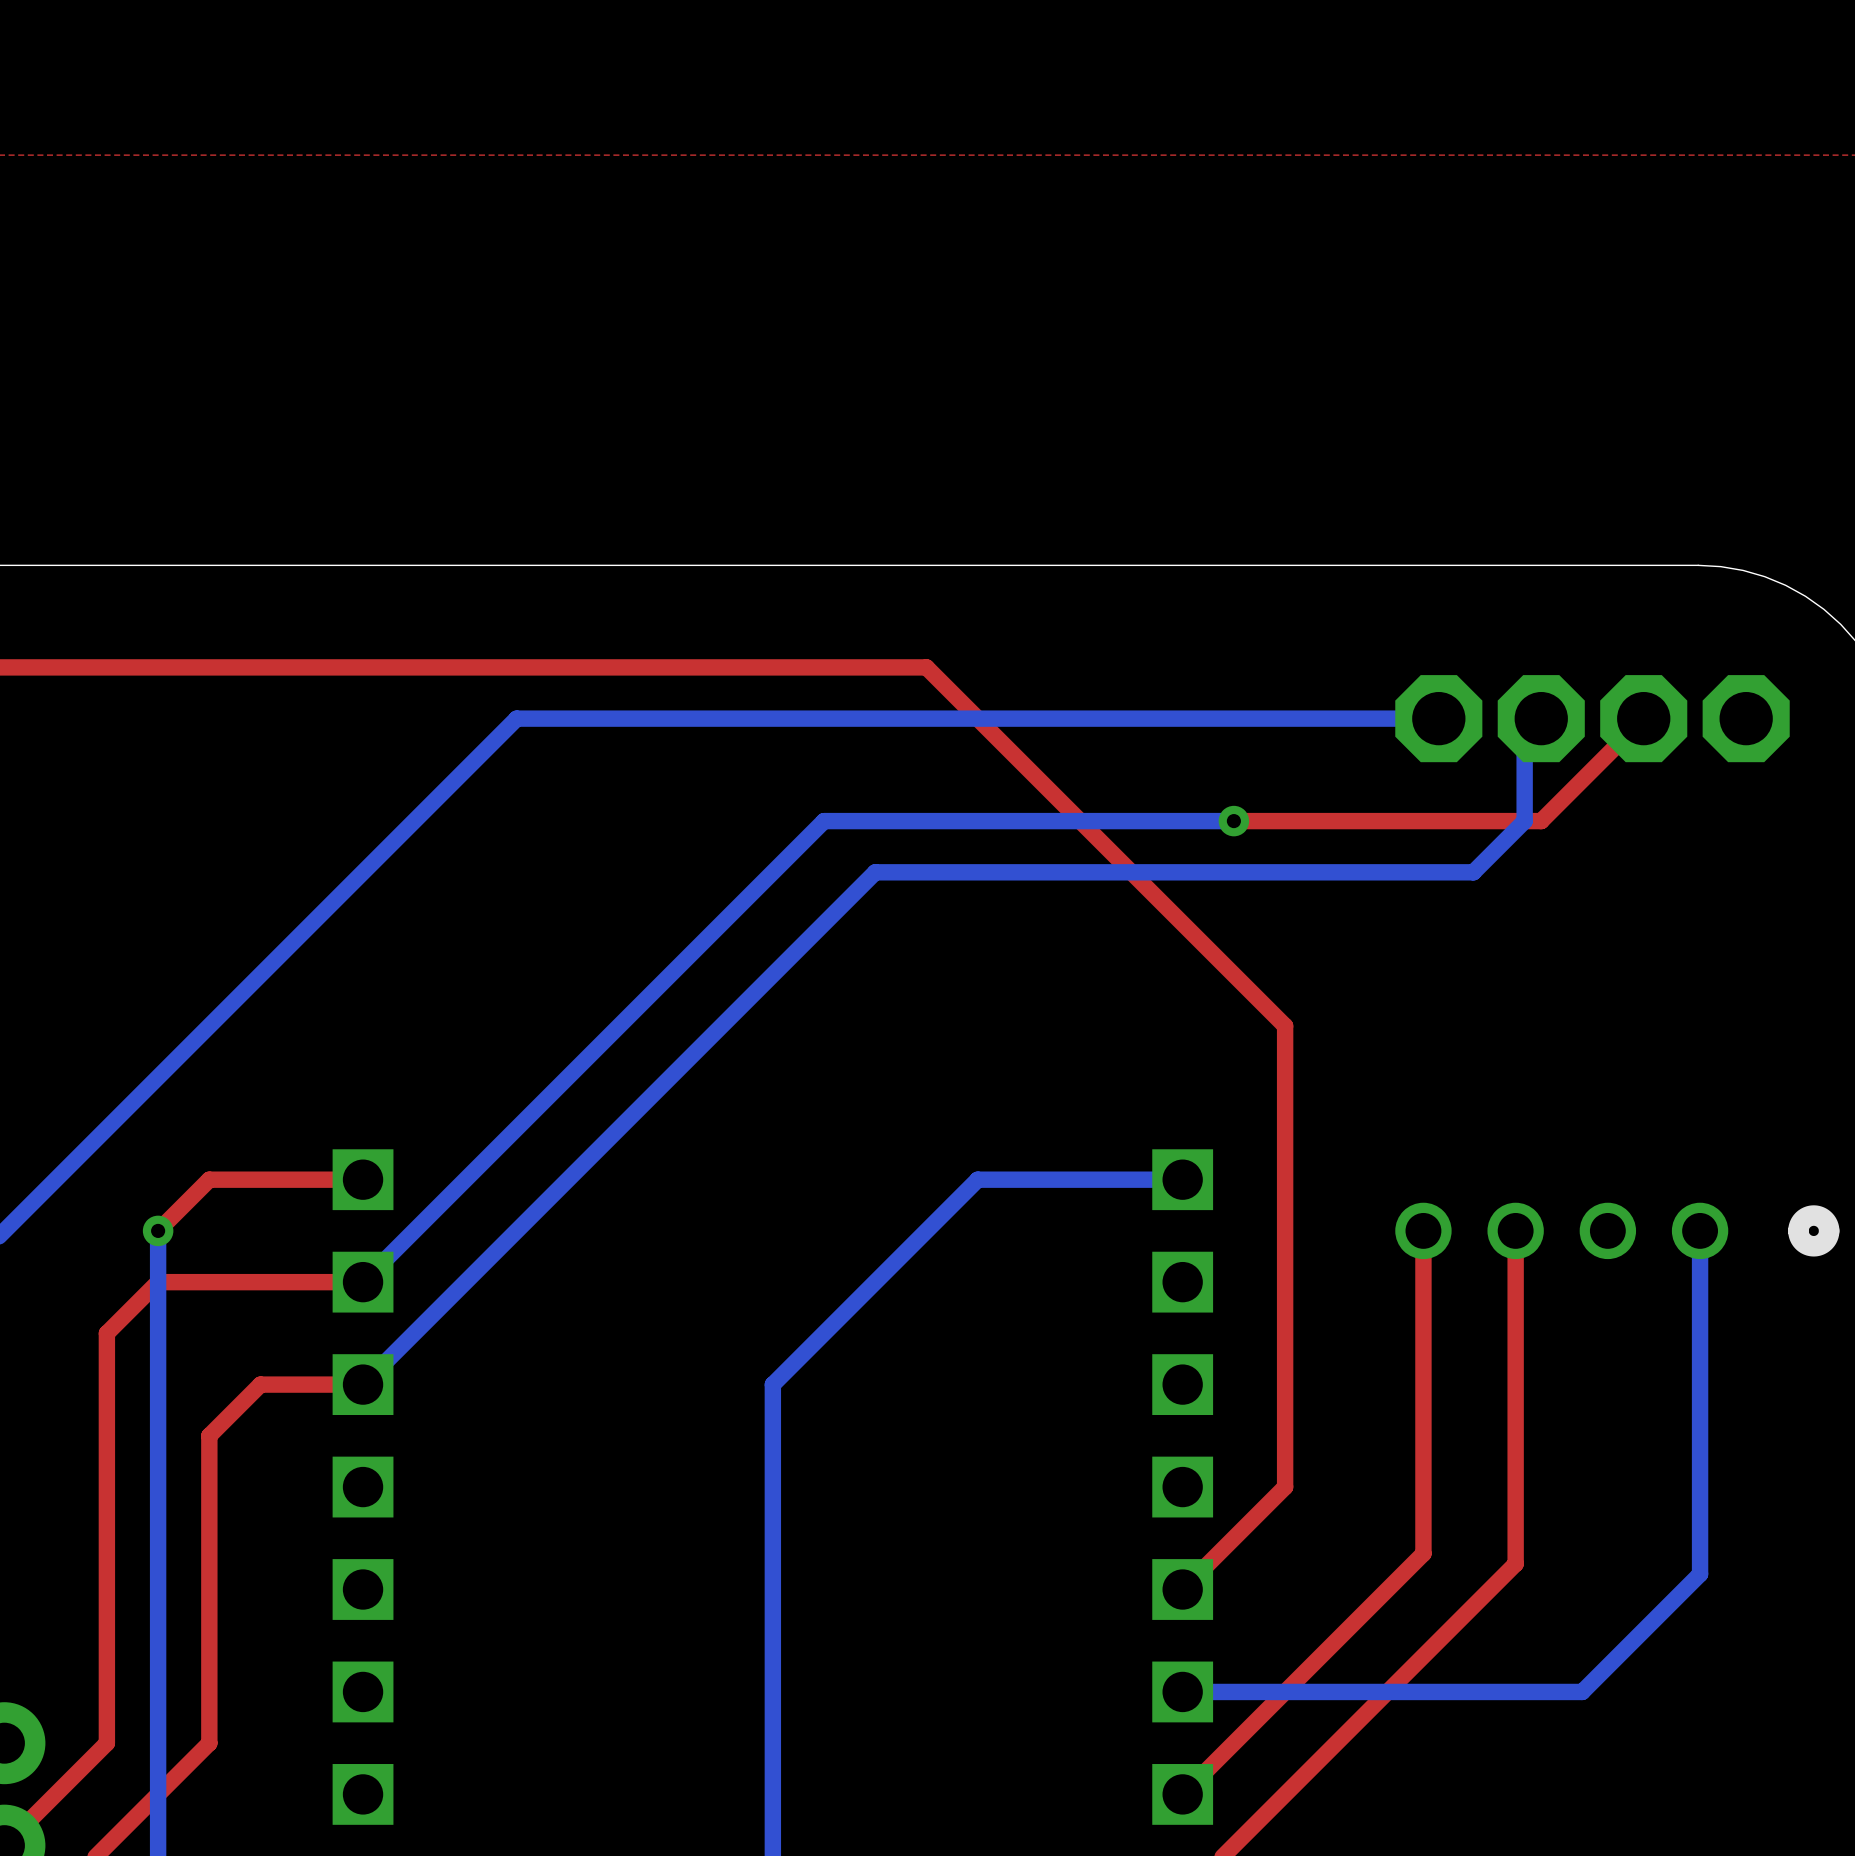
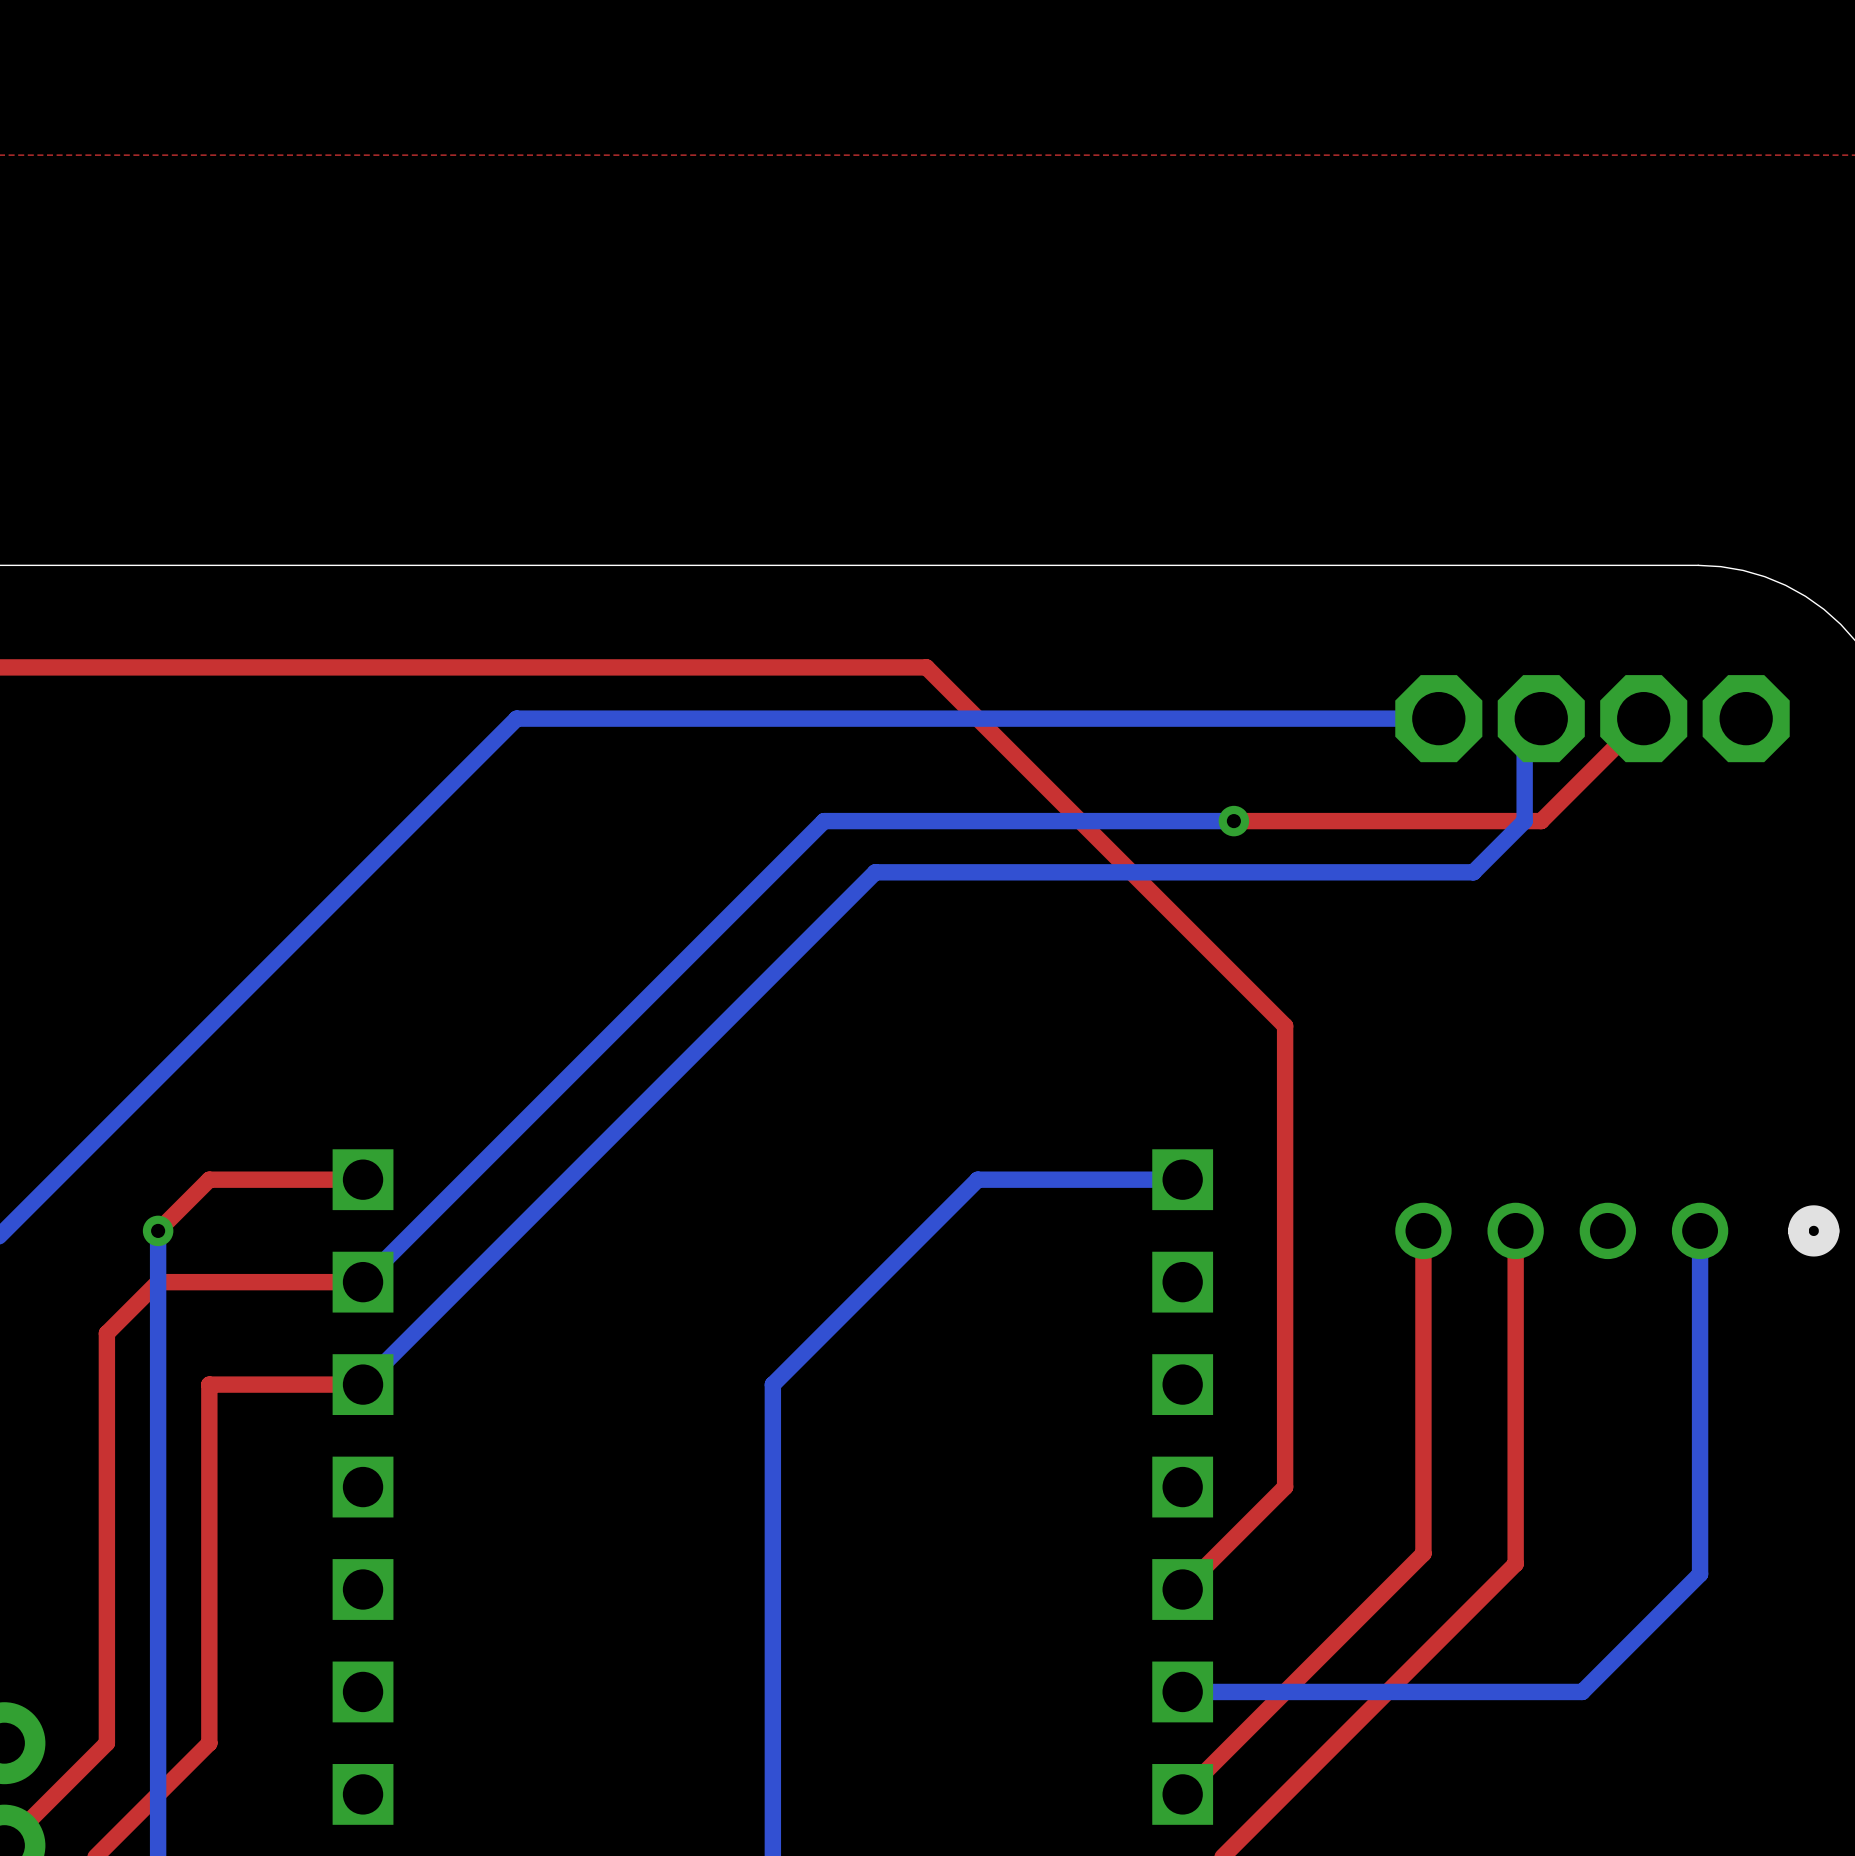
top track: (260, 1384) (209, 1435) -> (260, 1384) (209, 1384) (209, 1435)

